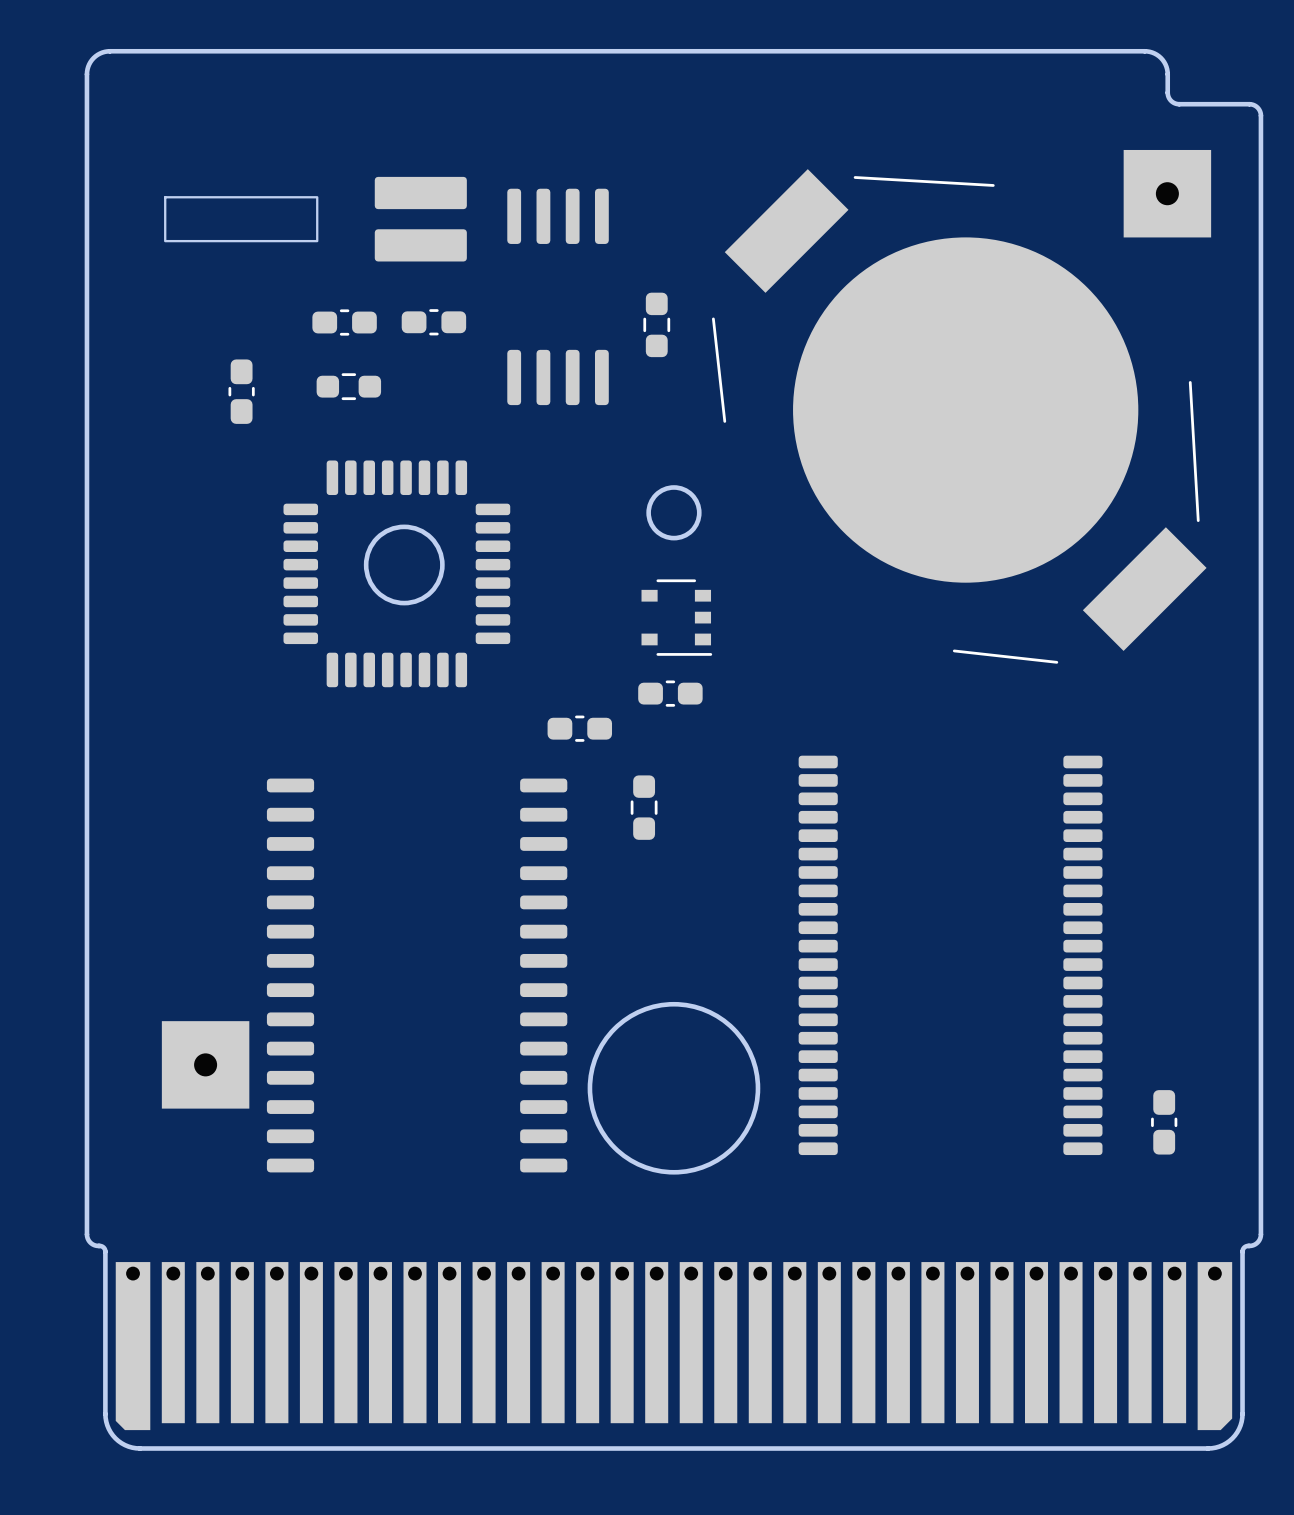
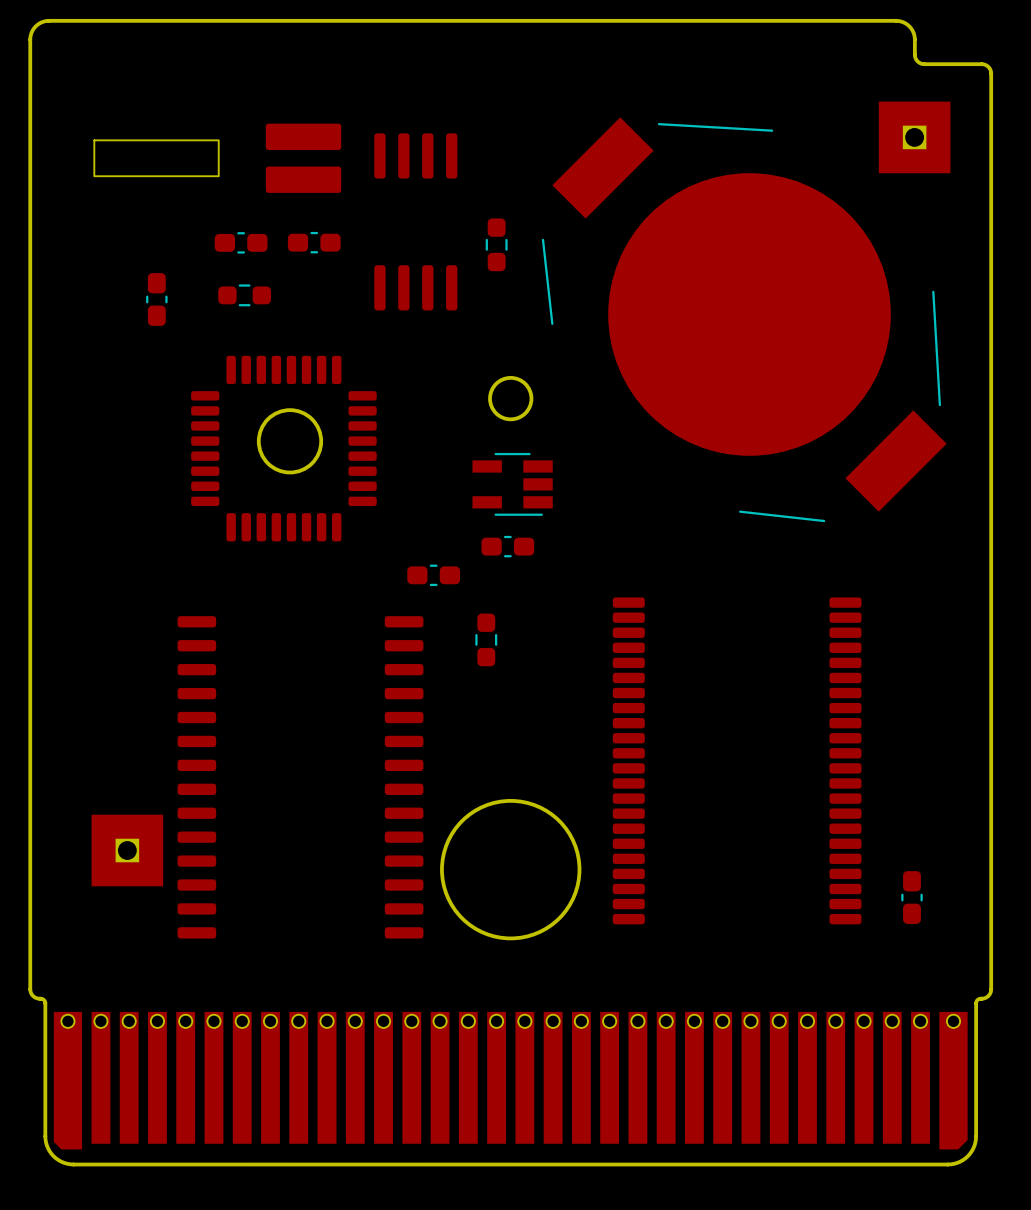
part footprint: [641, 579, 713, 656] -> [472, 452, 553, 516]

